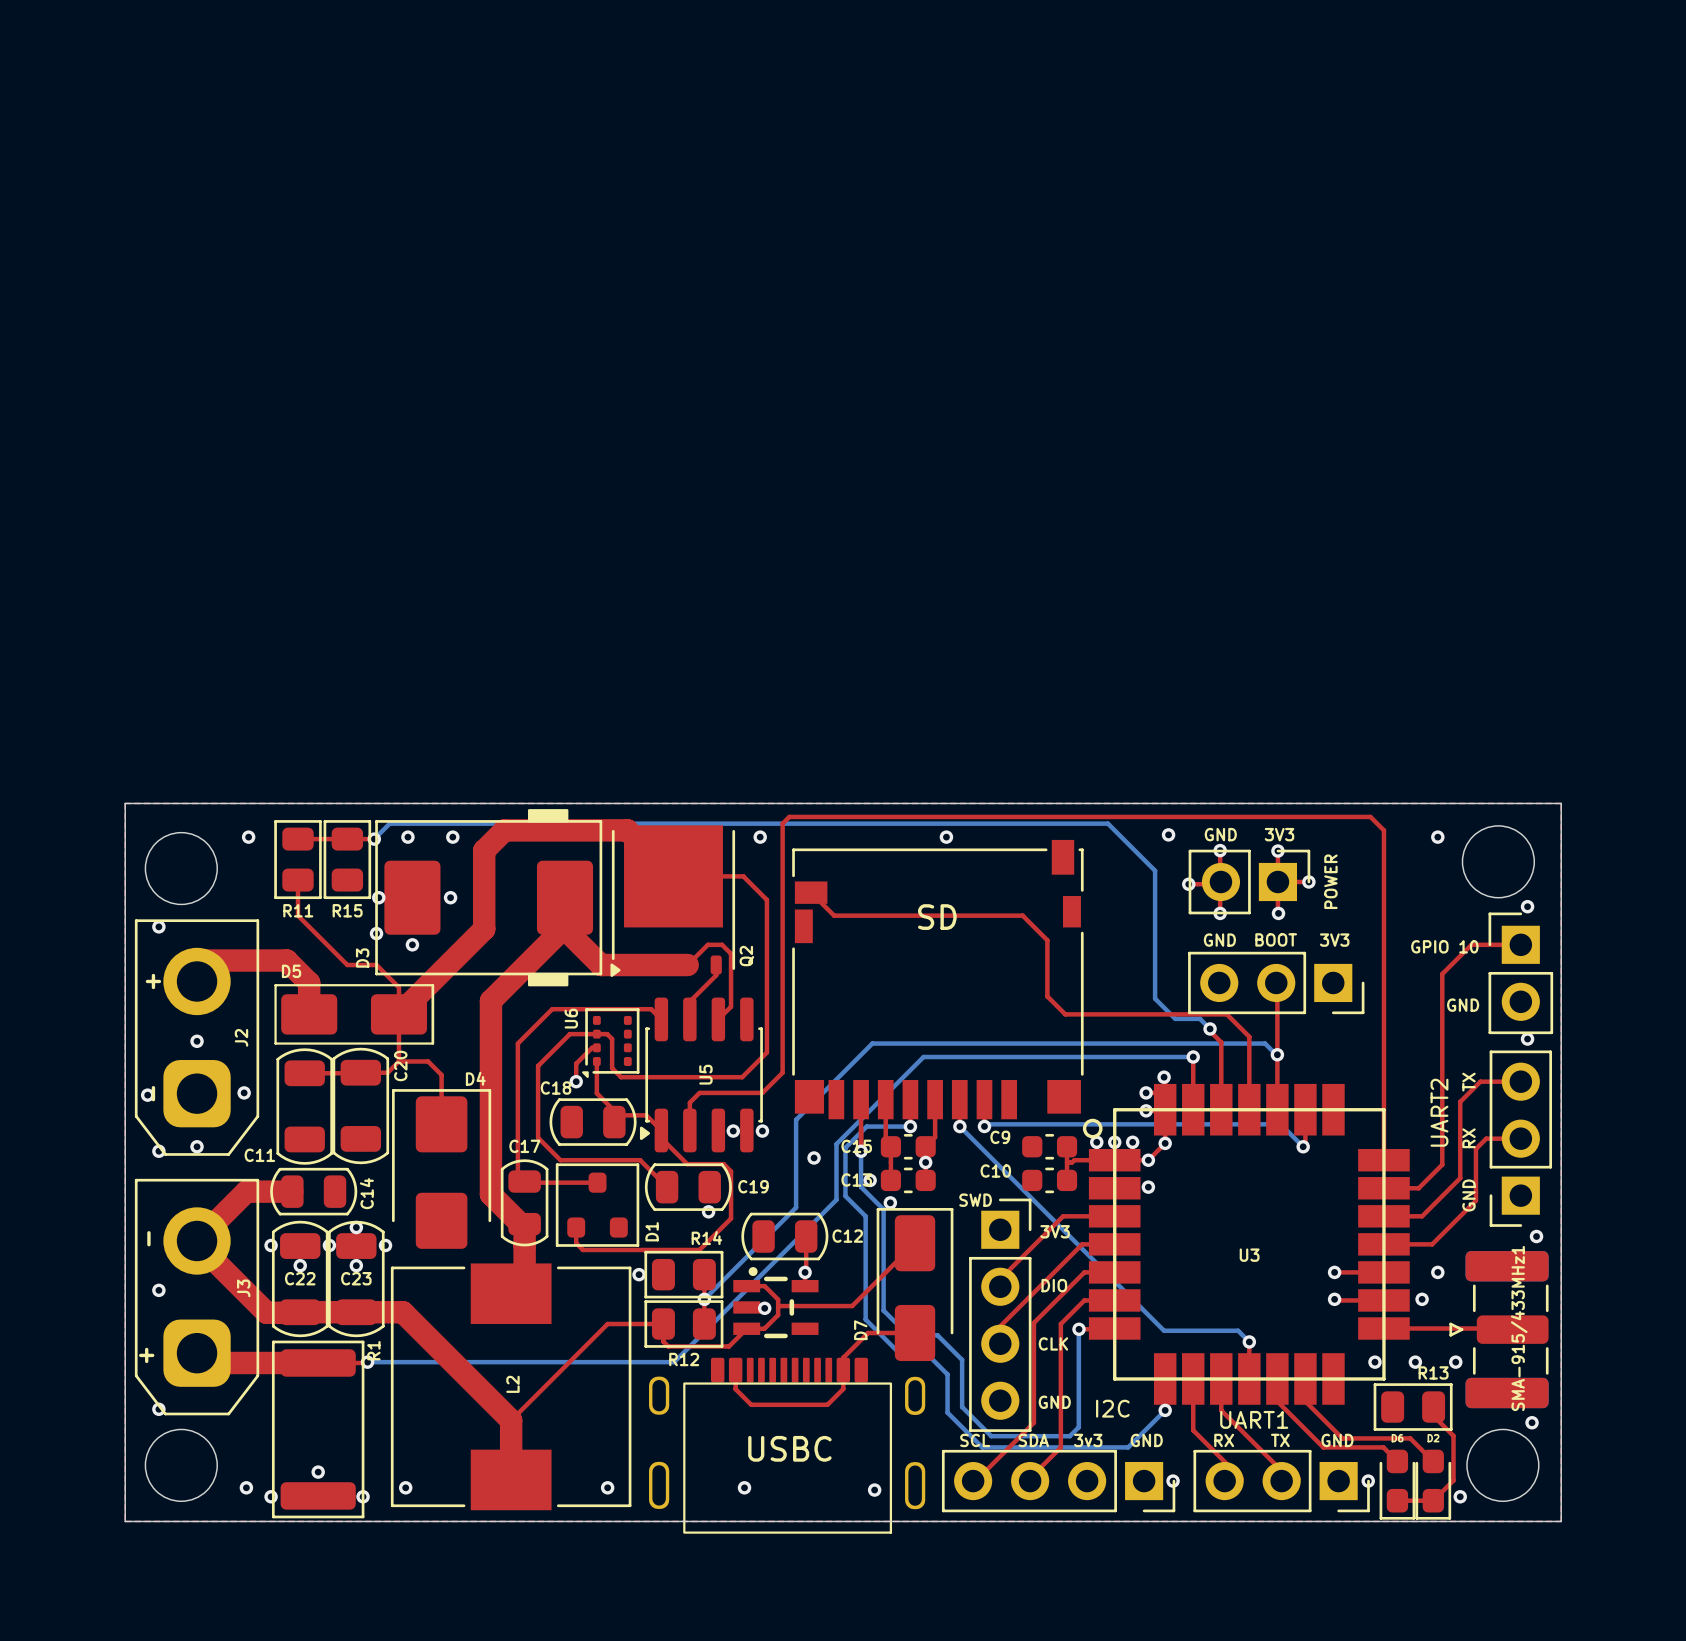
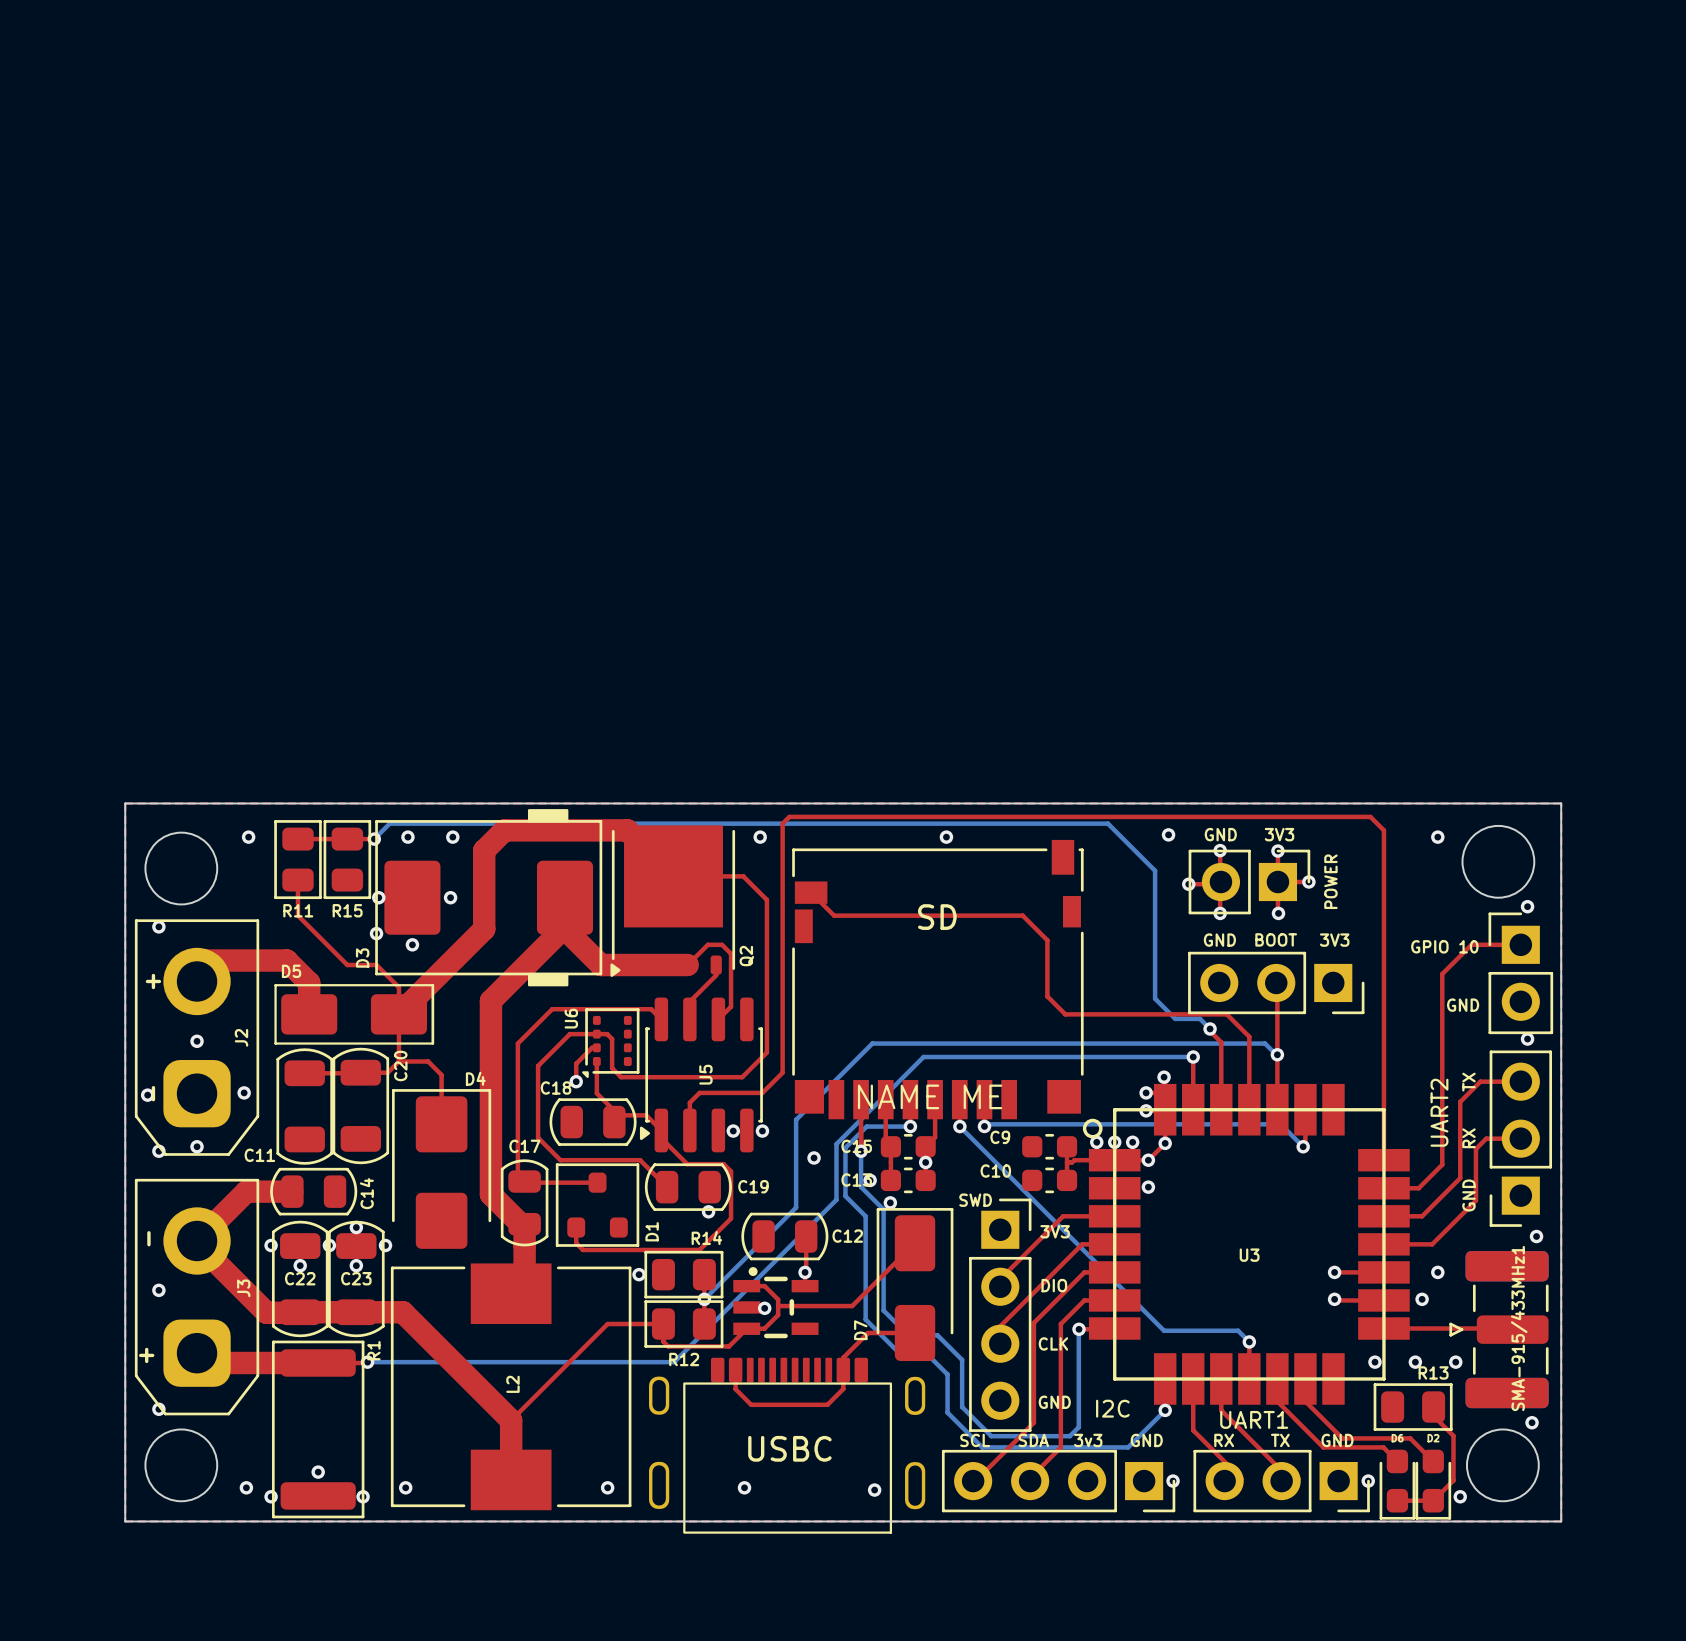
text: none -> NAME ME (930, 1096)

